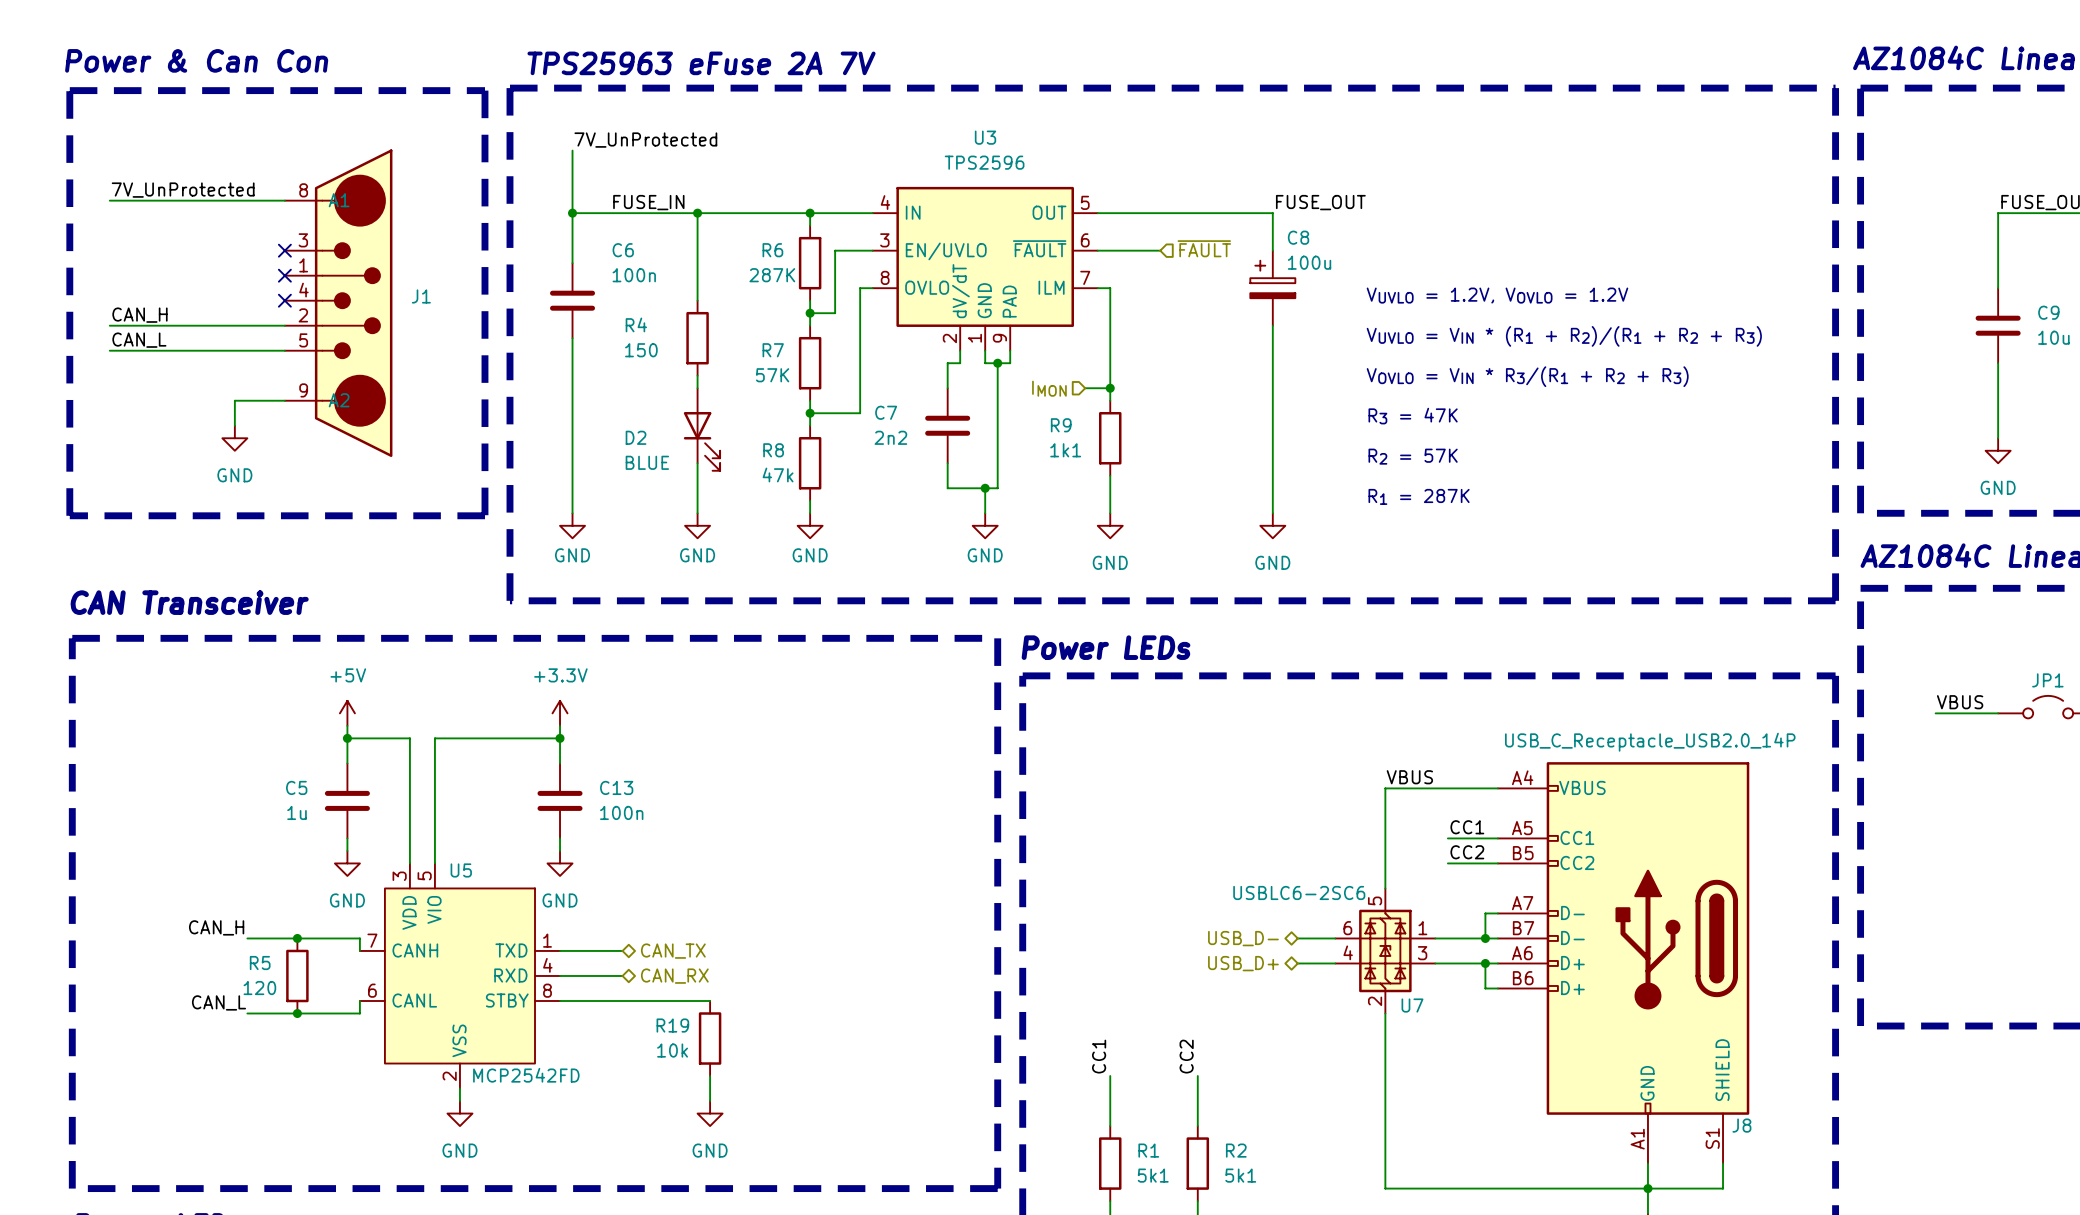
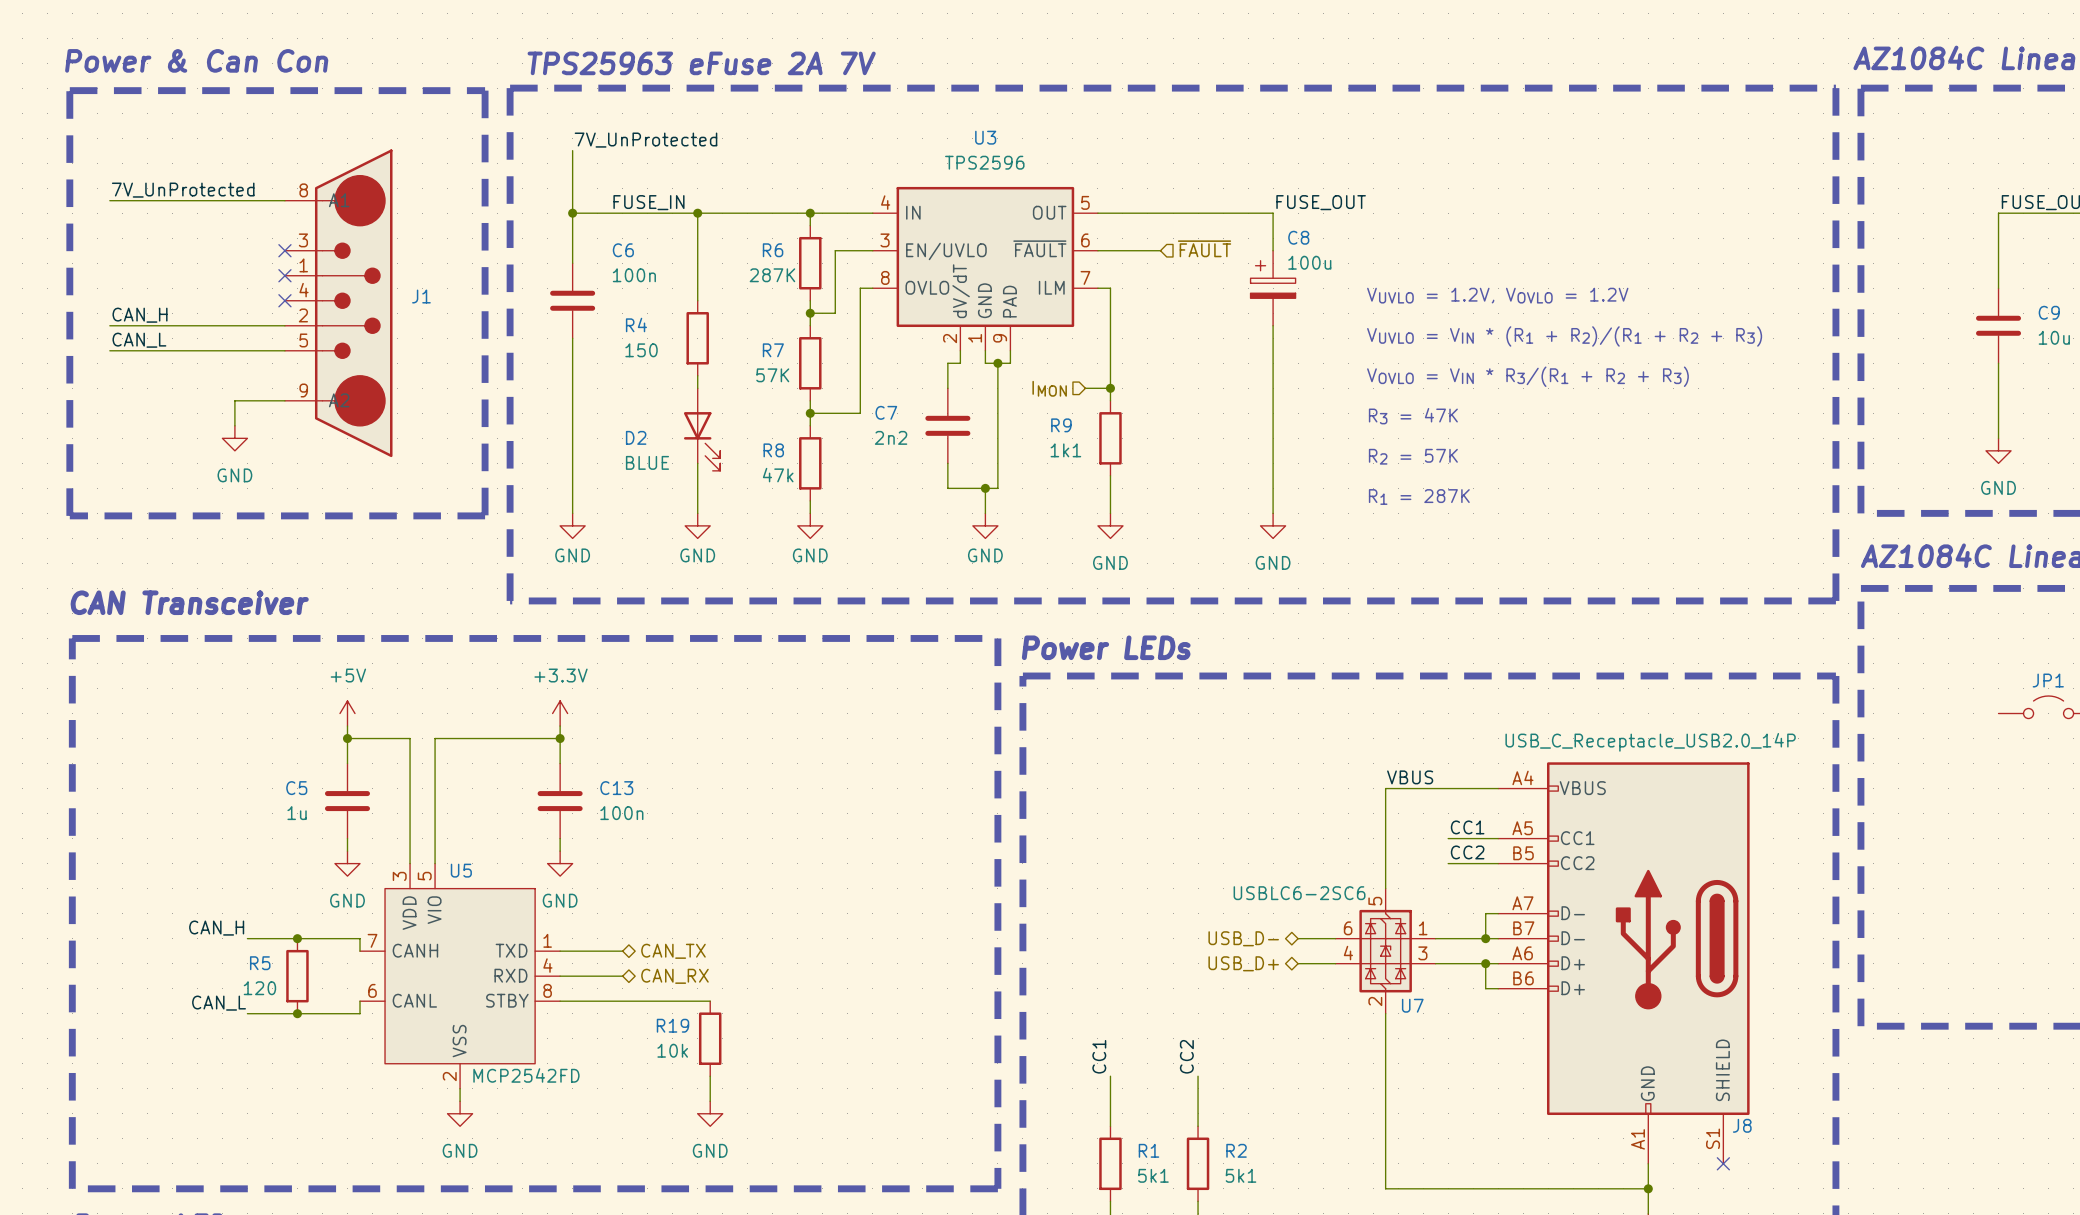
label: VBUS (1960, 702) -> none
wire: (1935, 713) (1998, 713) -> none
wire: (1723, 1163) (1723, 1188) (1647, 1188) -> none
no-connect mark: none -> (1723, 1163)

